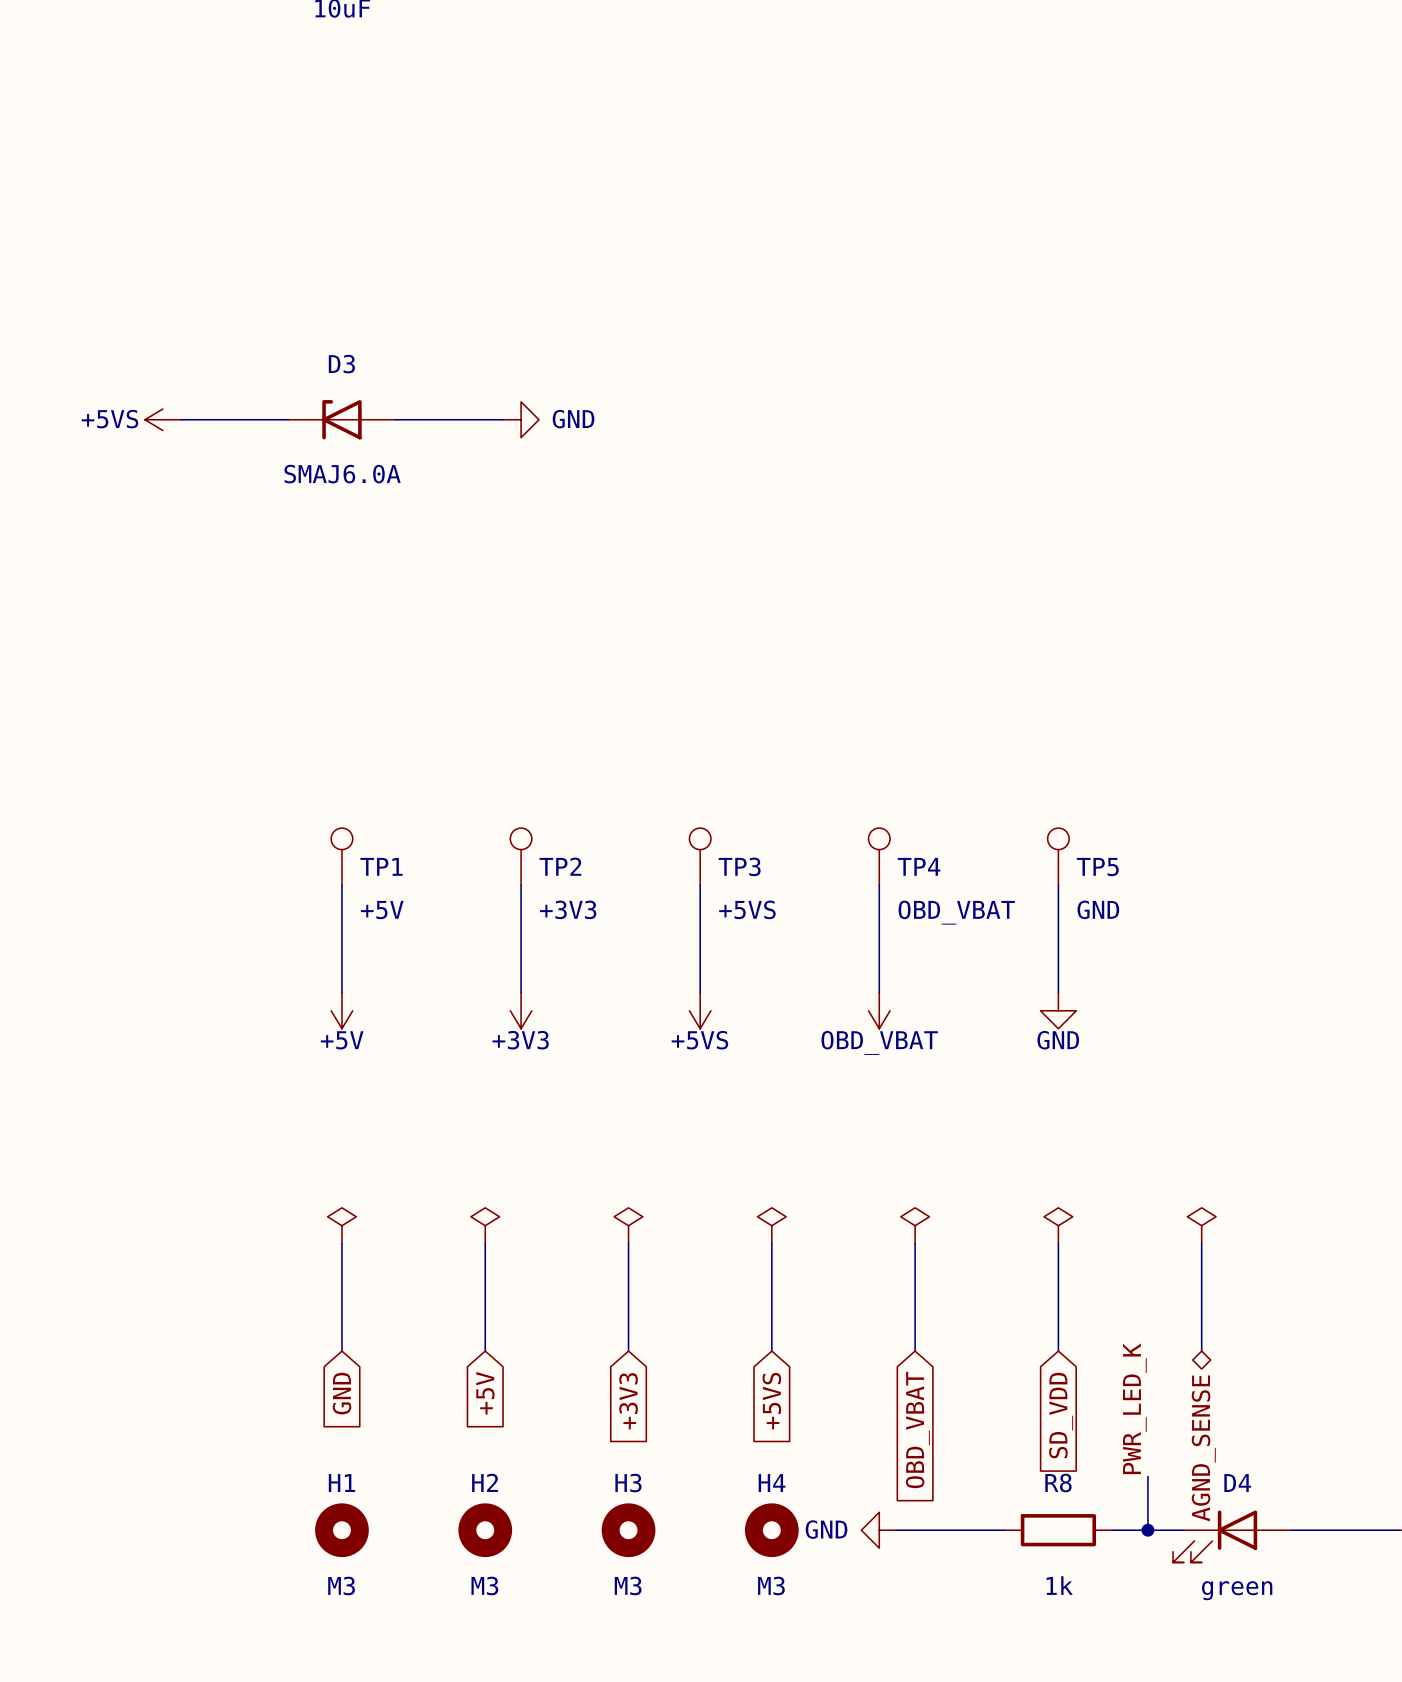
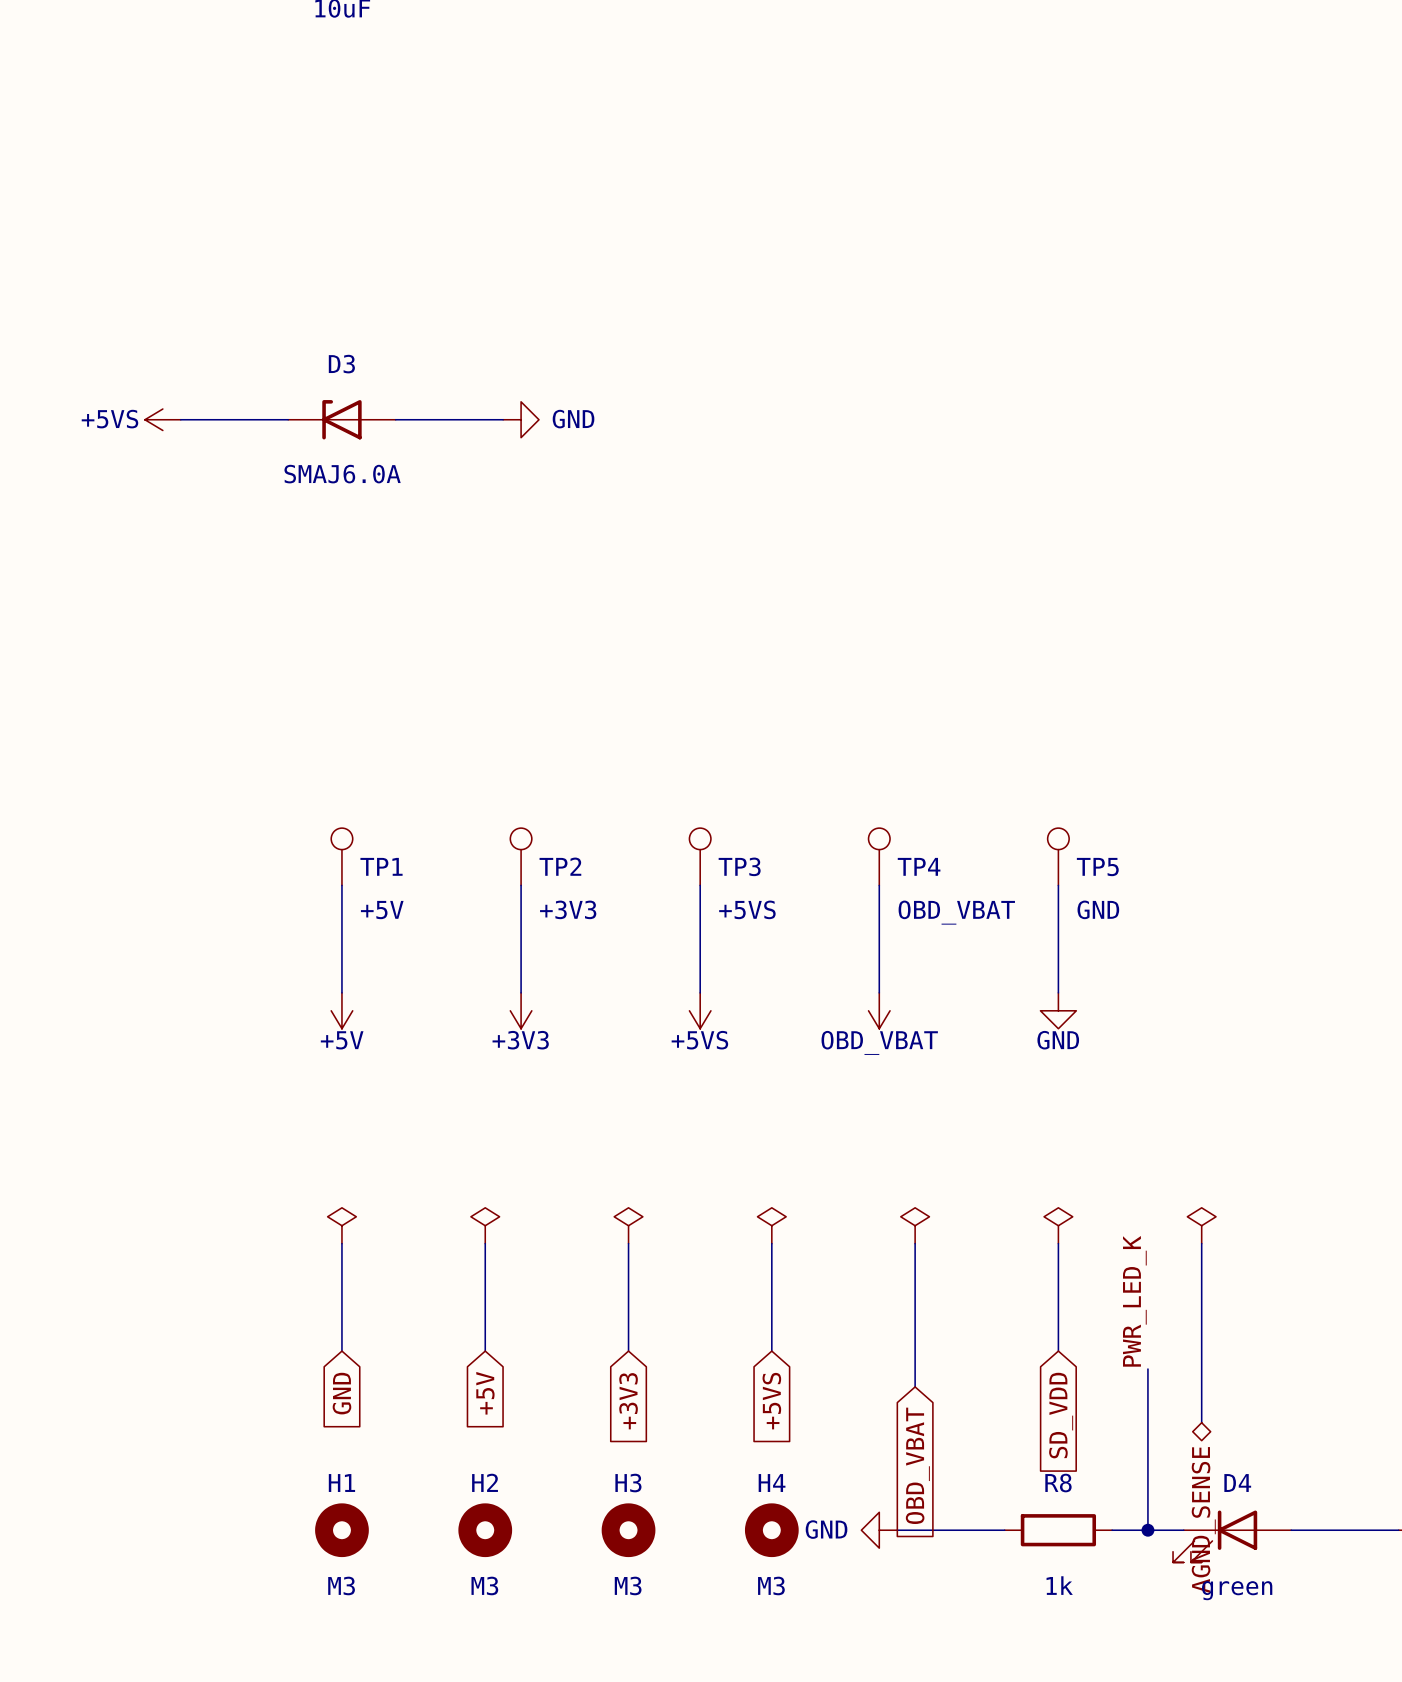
wire: none -> (915, 1351) (915, 1386)
wire: none -> (1201, 1351) (1201, 1422)
wire: none -> (1147, 1369) (1147, 1476)
label position: PWR_LED_K (1134, 1408) -> PWR_LED_K (1134, 1301)
global label position: OBD_VBAT (917, 1430) -> OBD_VBAT (917, 1465)
hierarchical label position: AGND_SENSE (1203, 1448) -> AGND_SENSE (1203, 1520)

